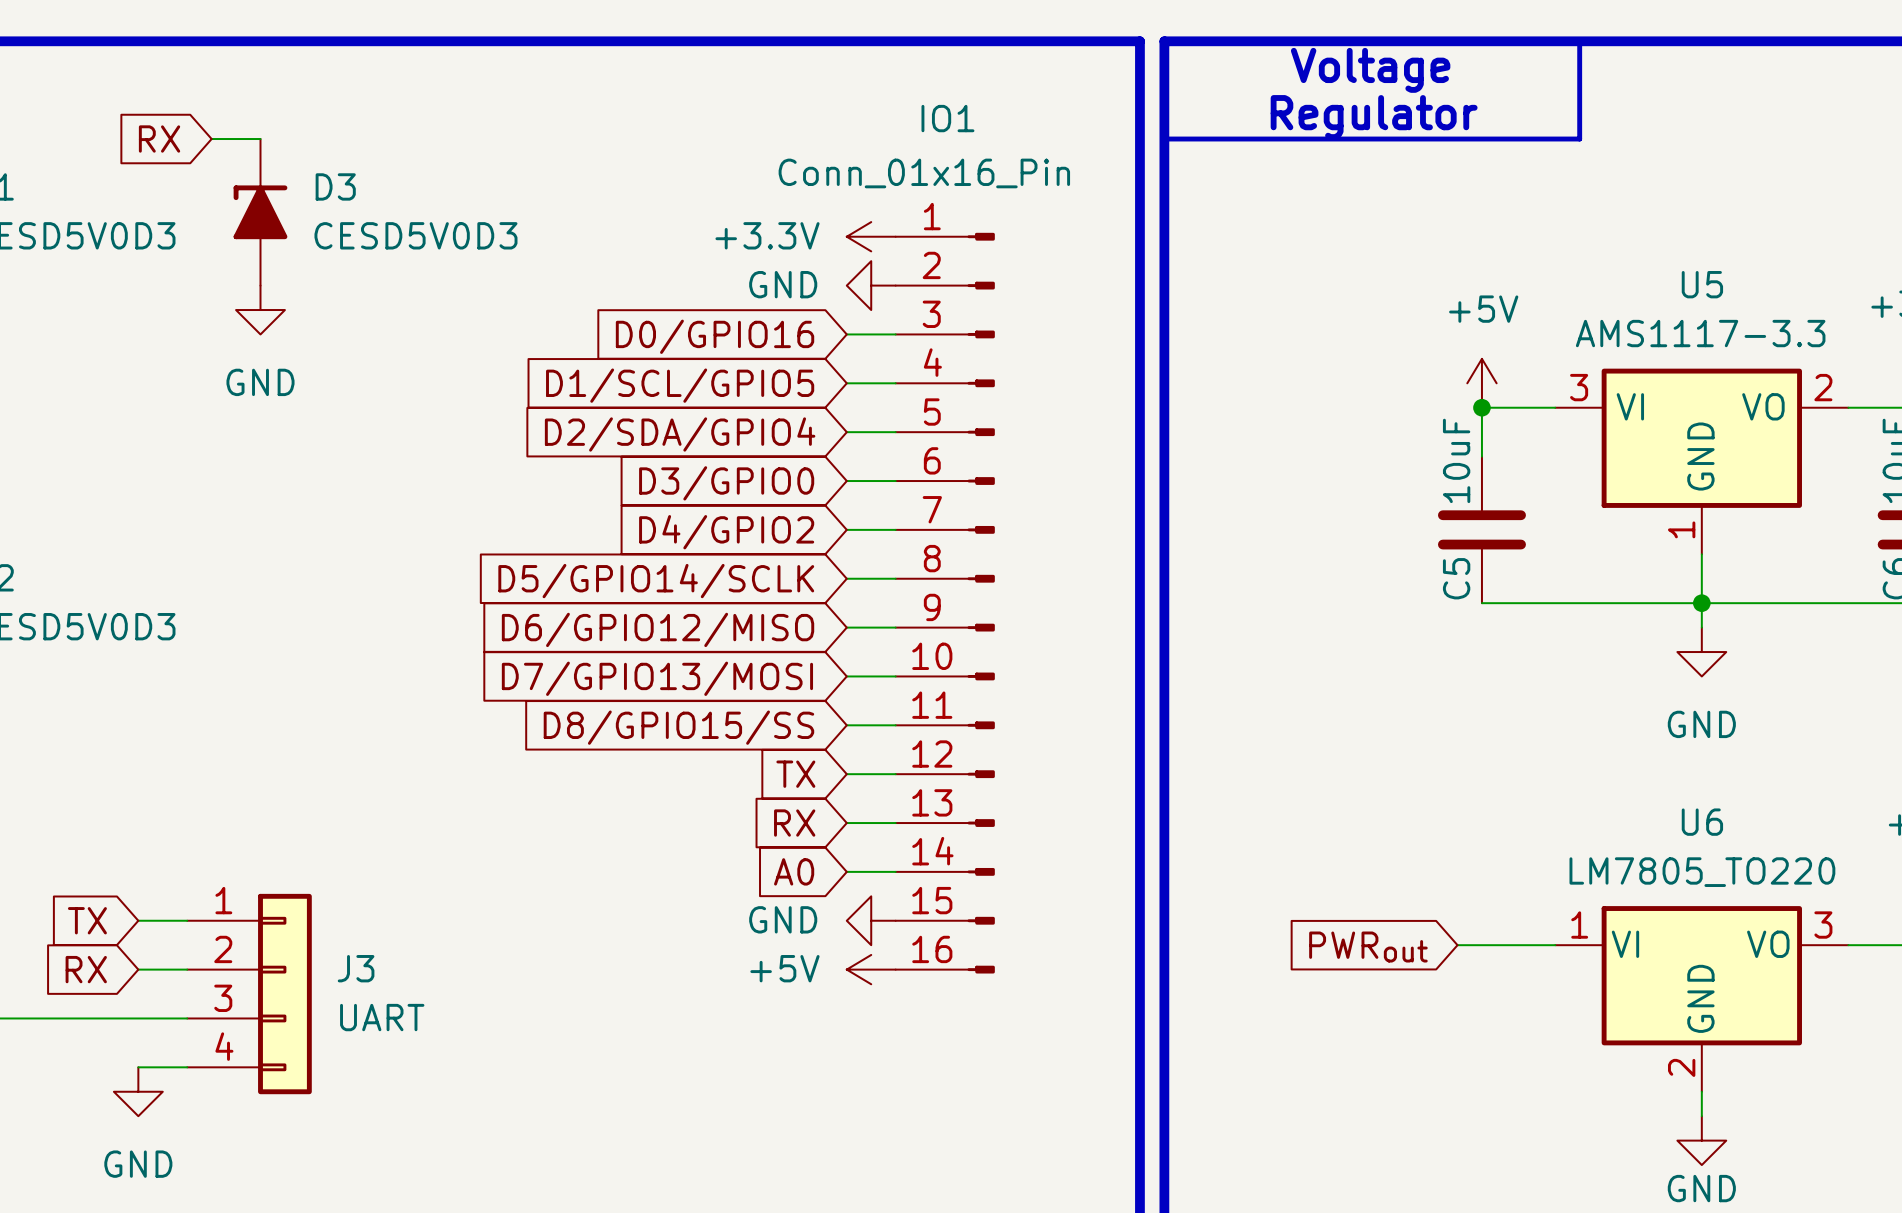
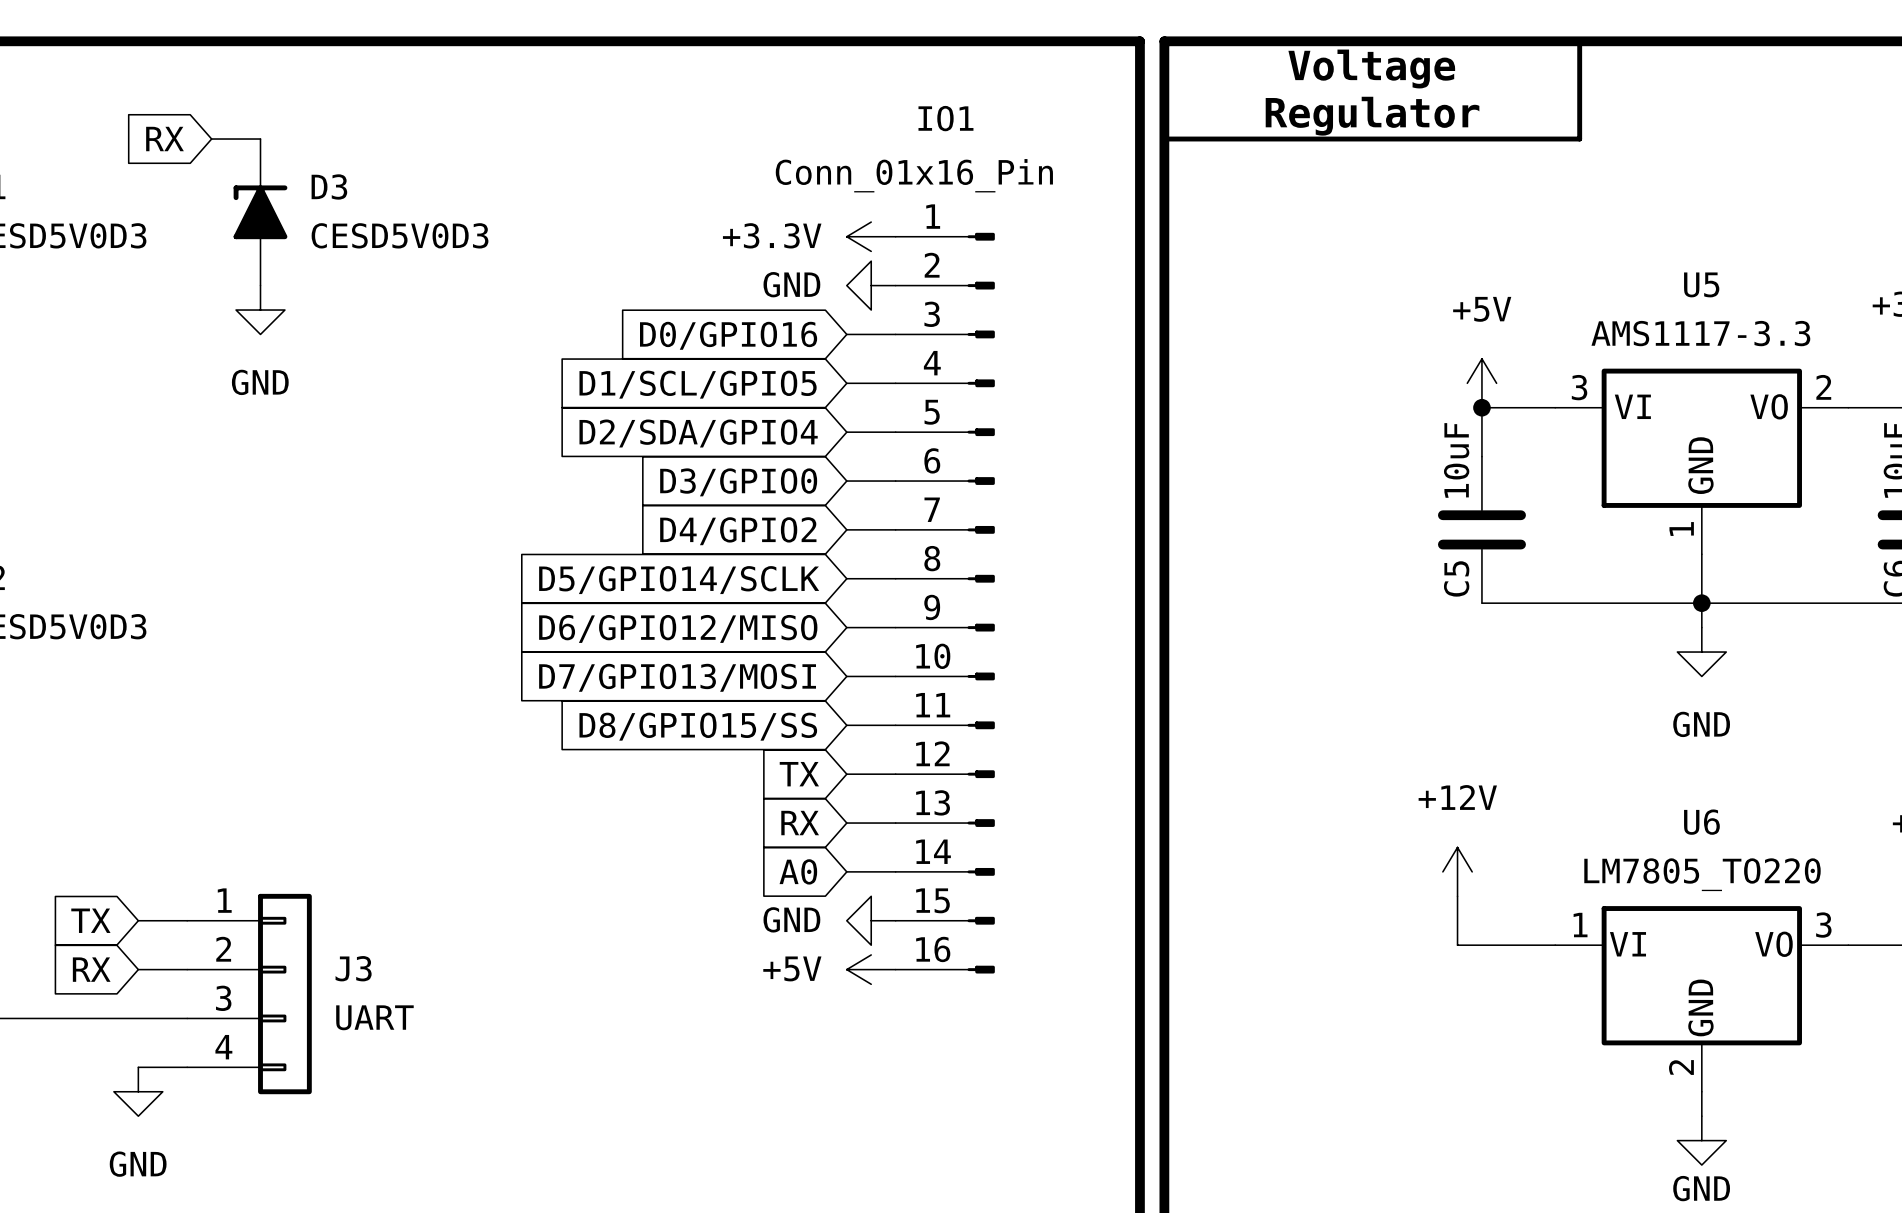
power symbol: none -> +12V (1457, 871)
wire: none -> (1457, 896) (1457, 945)
global label: PWRout (1368, 947) -> none

